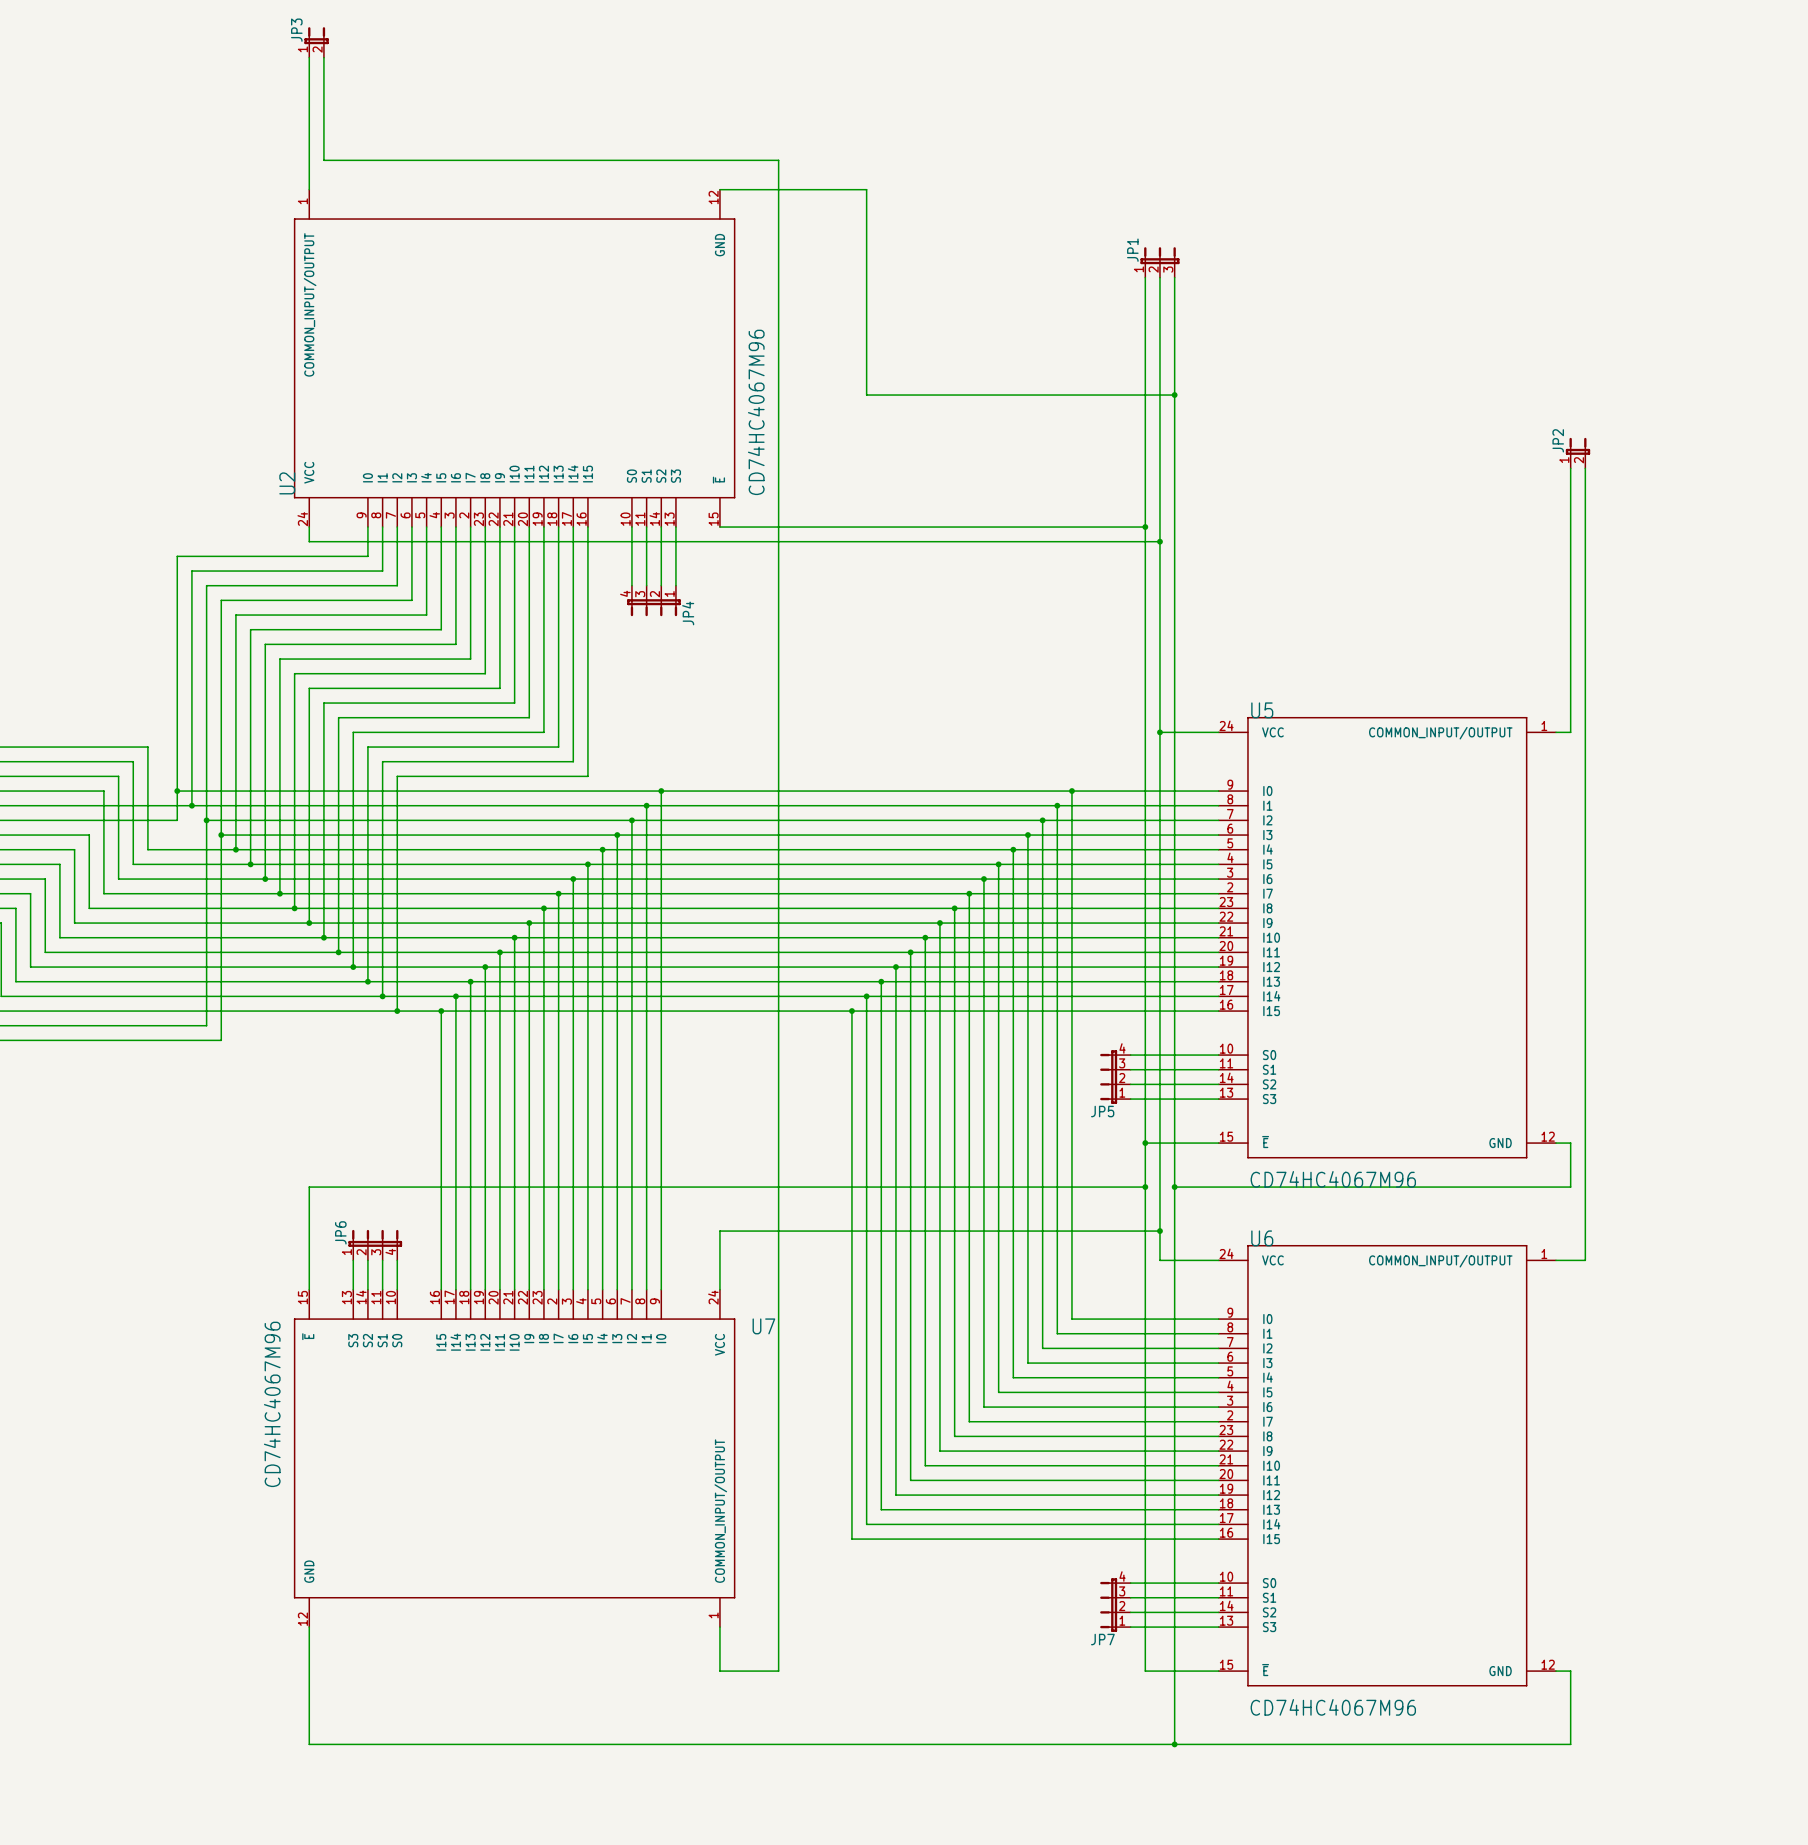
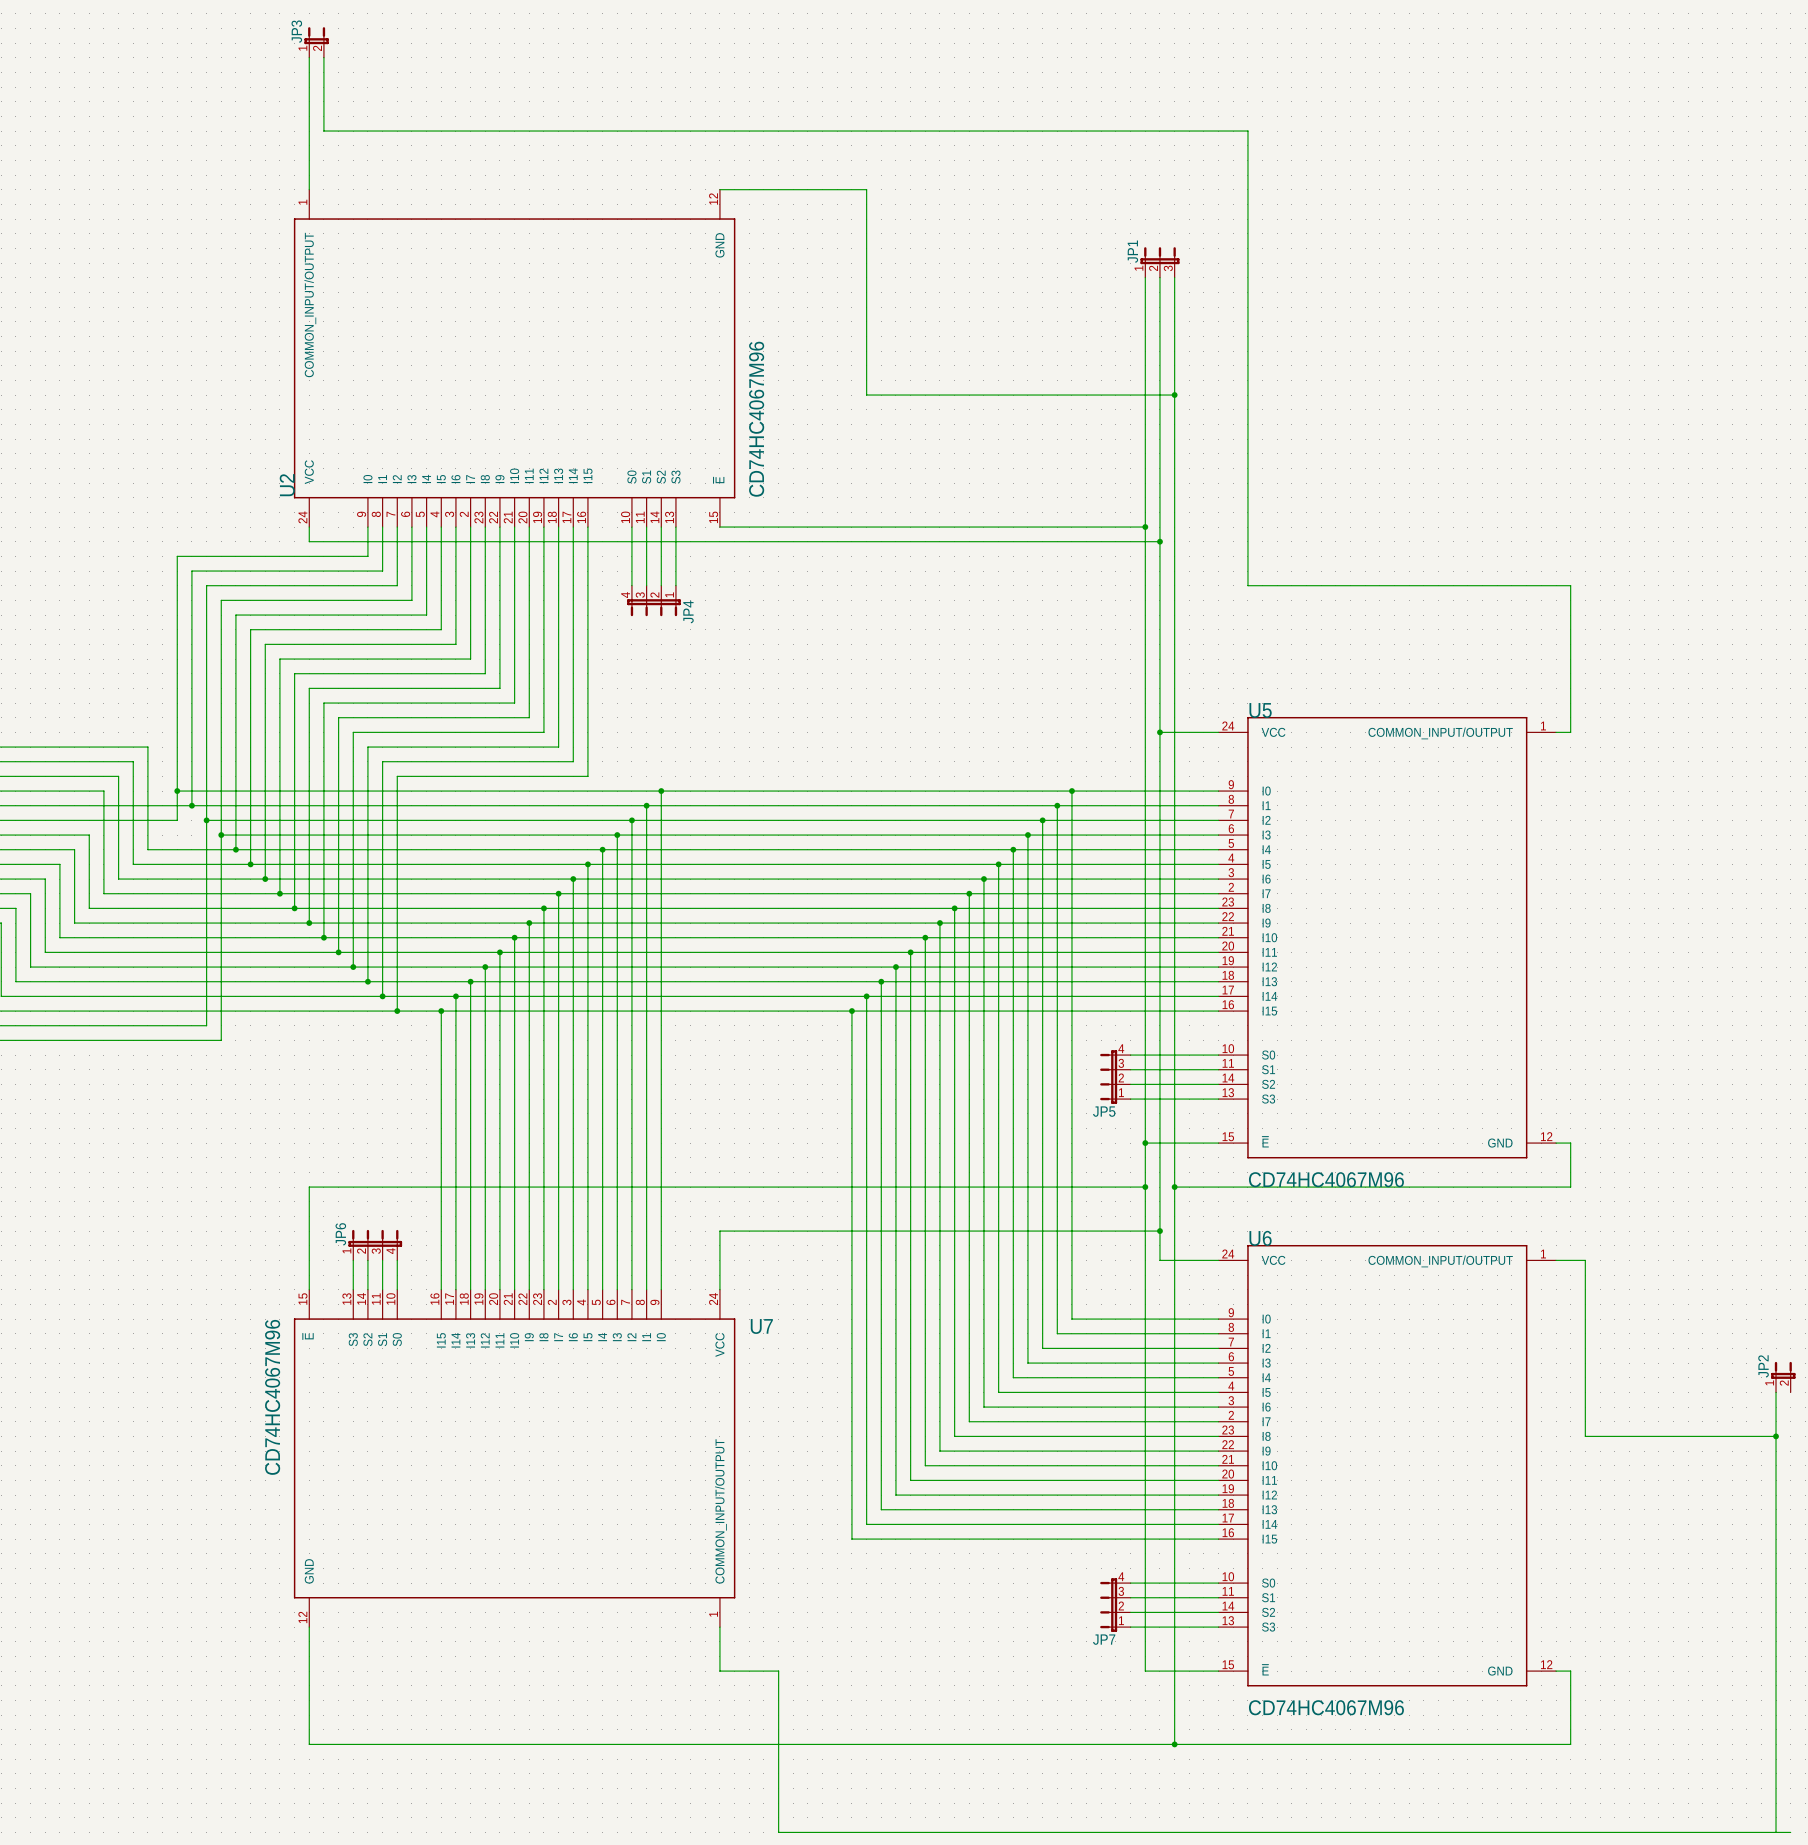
wire: (323, 131) (323, 160) (778, 160) (778, 1671) -> (1790, 1832) (778, 1832) (778, 1671)
JP2 position: (1578, 453) -> (1783, 1377)
wire: (1570, 468) (1570, 585) -> (323, 131) (1247, 131) (1247, 585) (1570, 585)
wire: (1585, 468) (1585, 1260) -> (1776, 1436) (1585, 1436) (1585, 1260)
wire: none -> (1776, 1392) (1776, 1832)
junction: none -> (1776, 1436)

